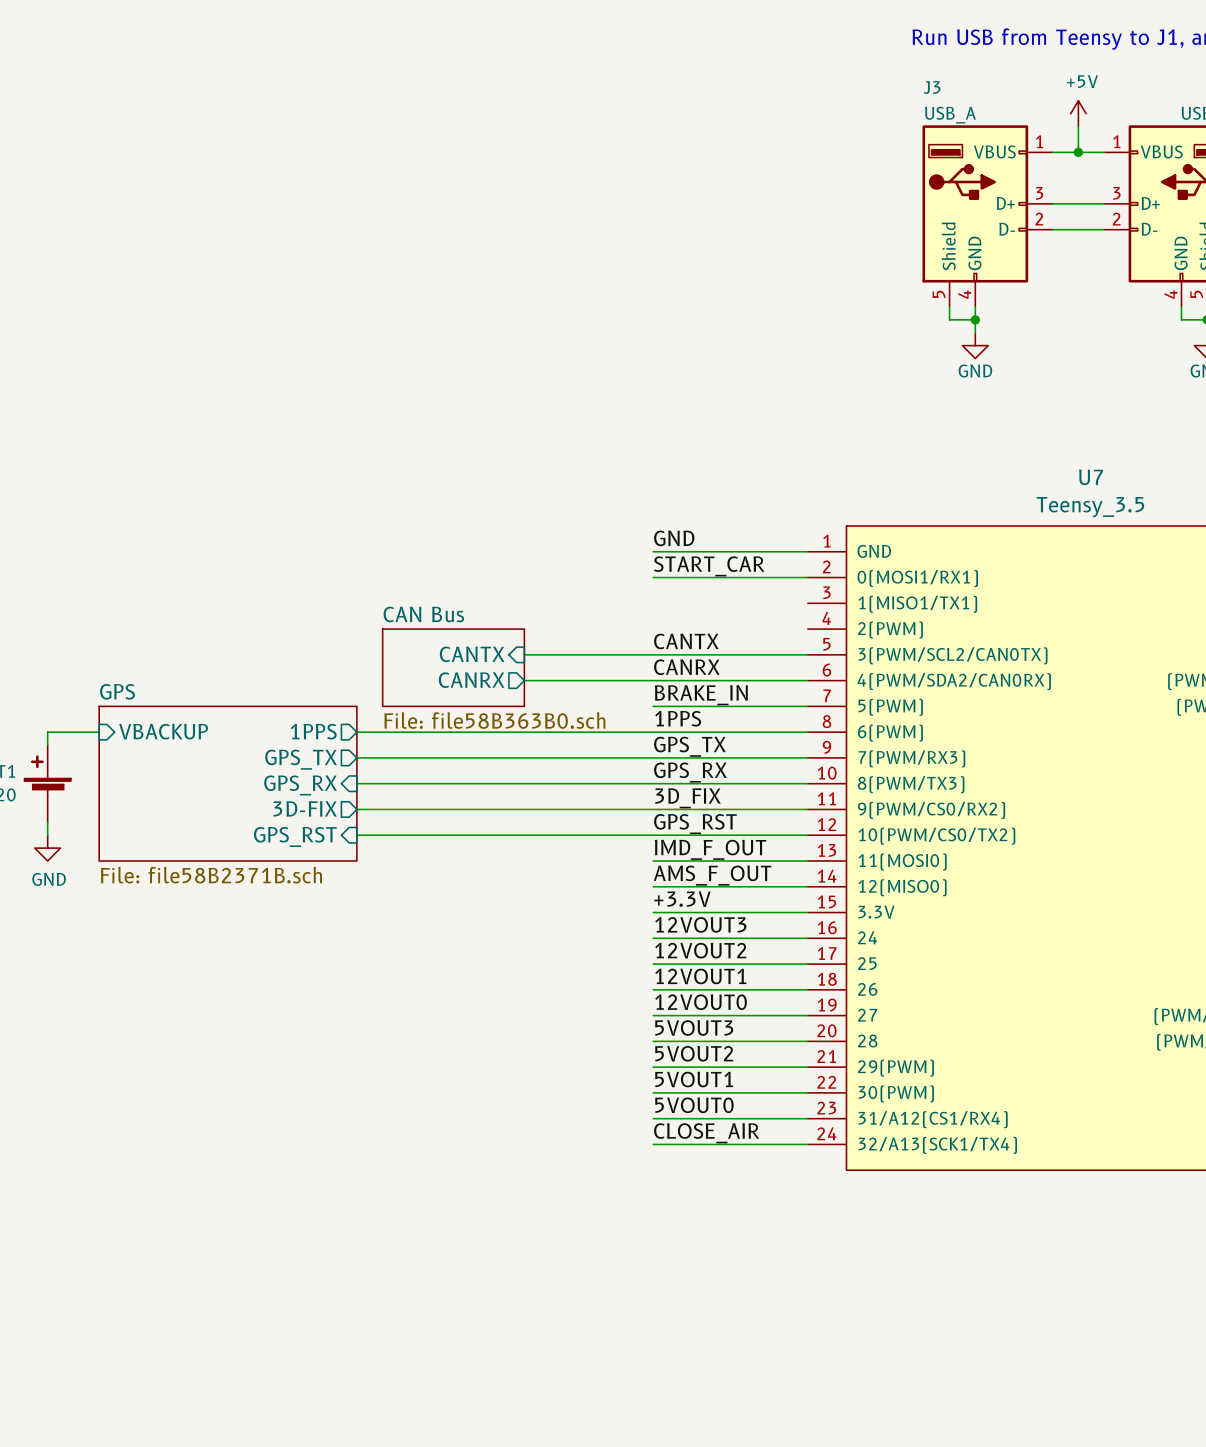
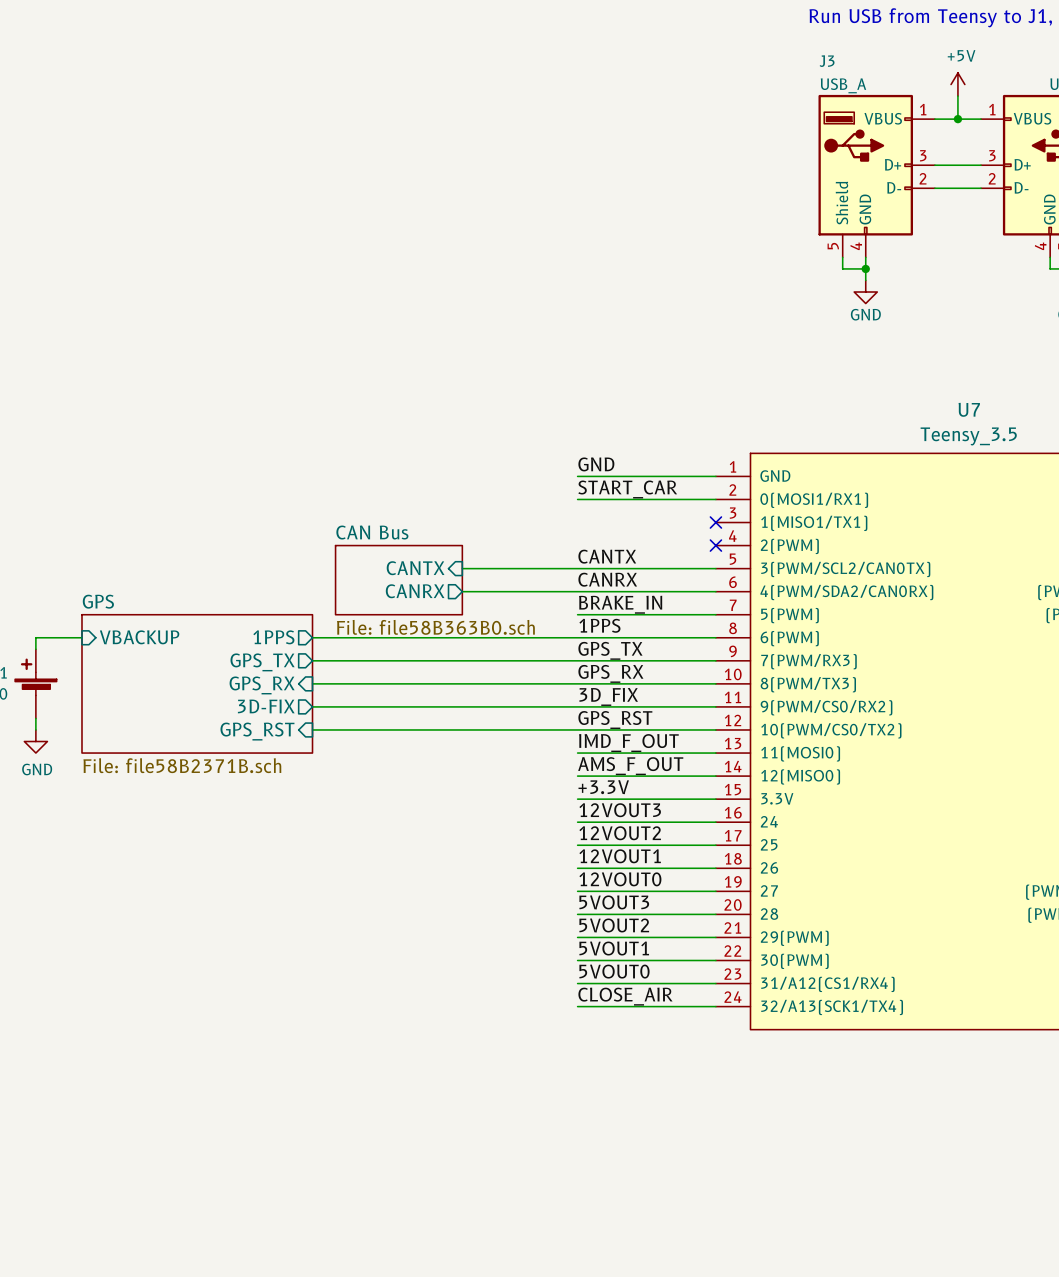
no-connect mark: none -> (715, 522)
no-connect mark: none -> (715, 545)

